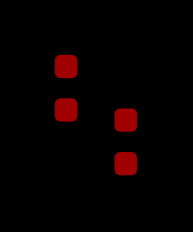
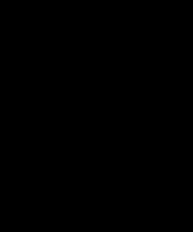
part: (66, 88) -> none
part: (125, 141) -> none

